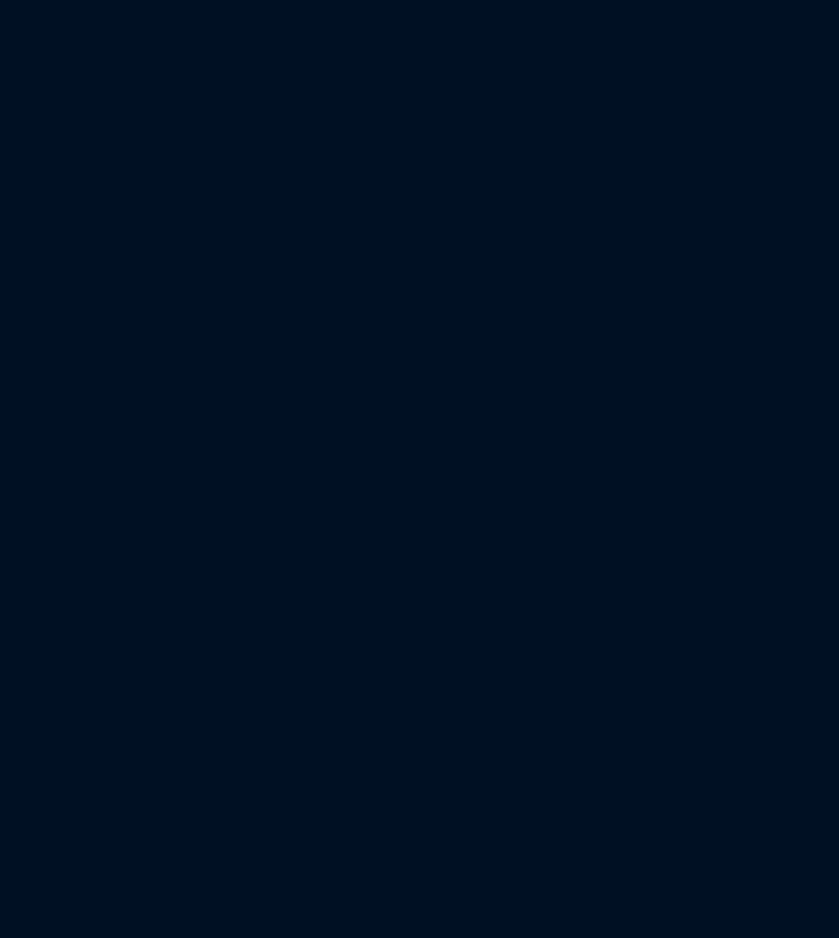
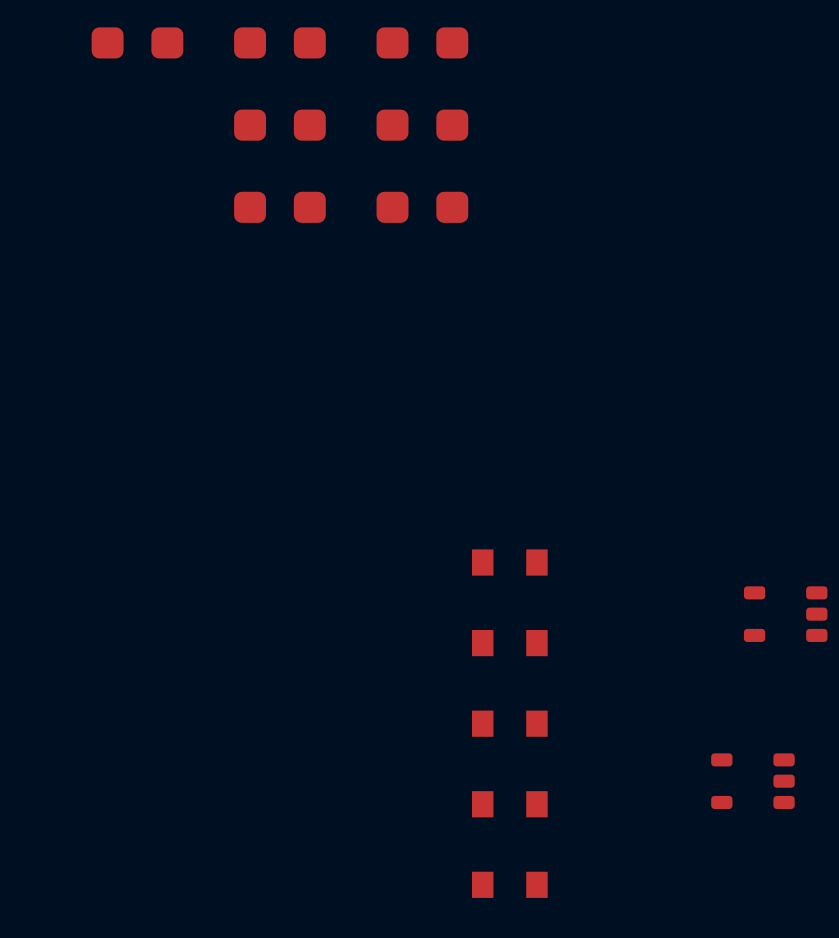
part: none -> (137, 42)
part: none -> (279, 42)
part: none -> (422, 42)
part: none -> (279, 125)
part: none -> (422, 125)
part: none -> (279, 207)
part: none -> (422, 207)
part: none -> (509, 562)
part: none -> (785, 614)
part: none -> (509, 643)
part: none -> (509, 723)
part: none -> (752, 781)
part: none -> (509, 804)
part: none -> (509, 884)

